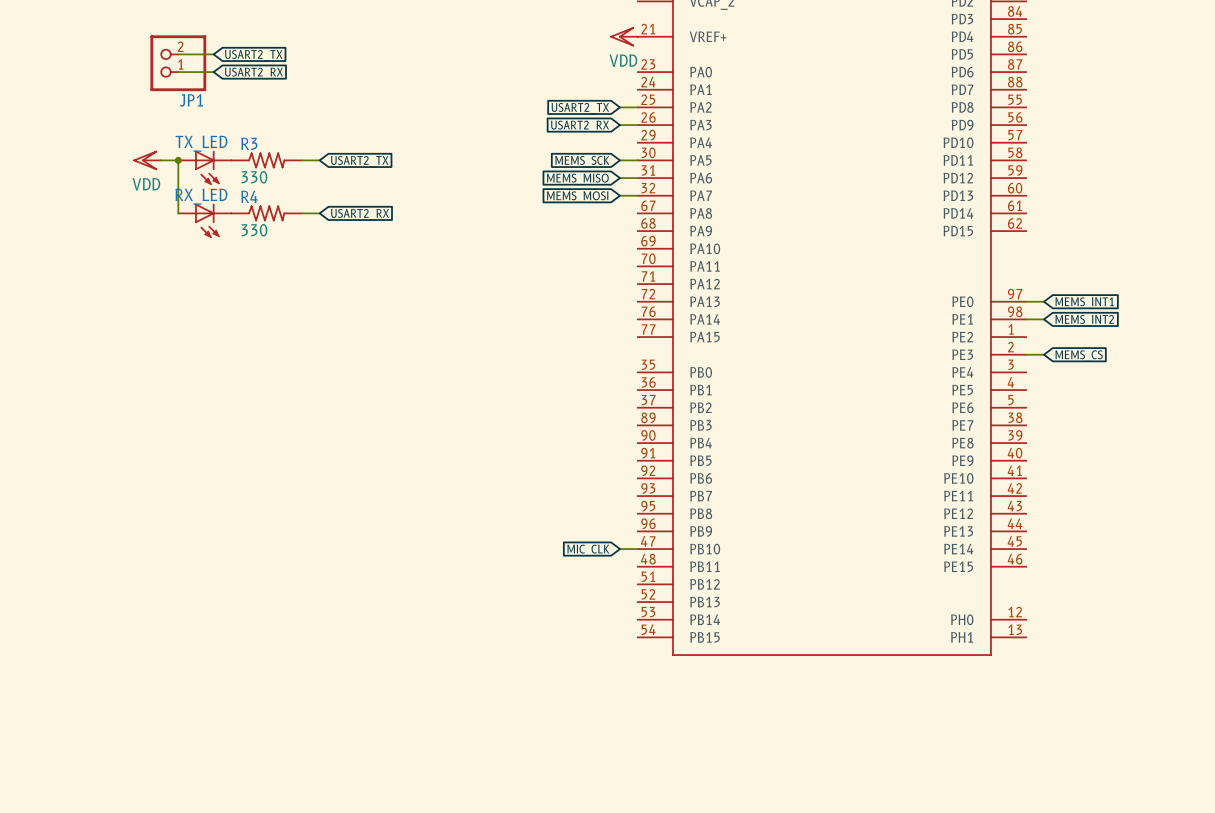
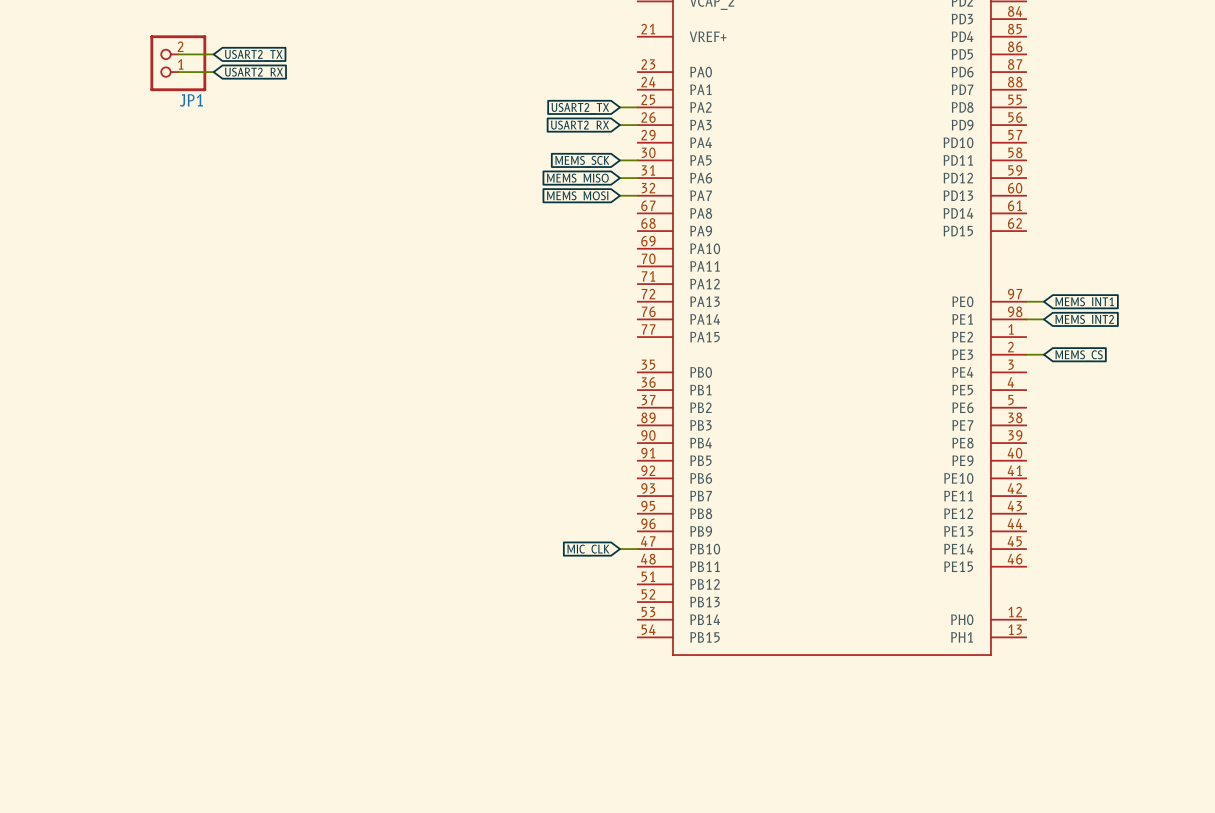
power symbol: VDD (623, 36) -> none
power symbol: VDD (146, 160) -> none
wire: (160, 160) (178, 160) (178, 213) -> none
junction: (178, 160) -> none
R3: 330 (266, 160) -> none
wire: (301, 160) (319, 160) -> none
global label: USART2_TX (359, 161) -> none
TX_LED: (204, 167) -> none
R4: 330 (266, 213) -> none
wire: (301, 213) (319, 213) -> none
global label: USART2_RX (360, 214) -> none
RX_LED: (204, 220) -> none

